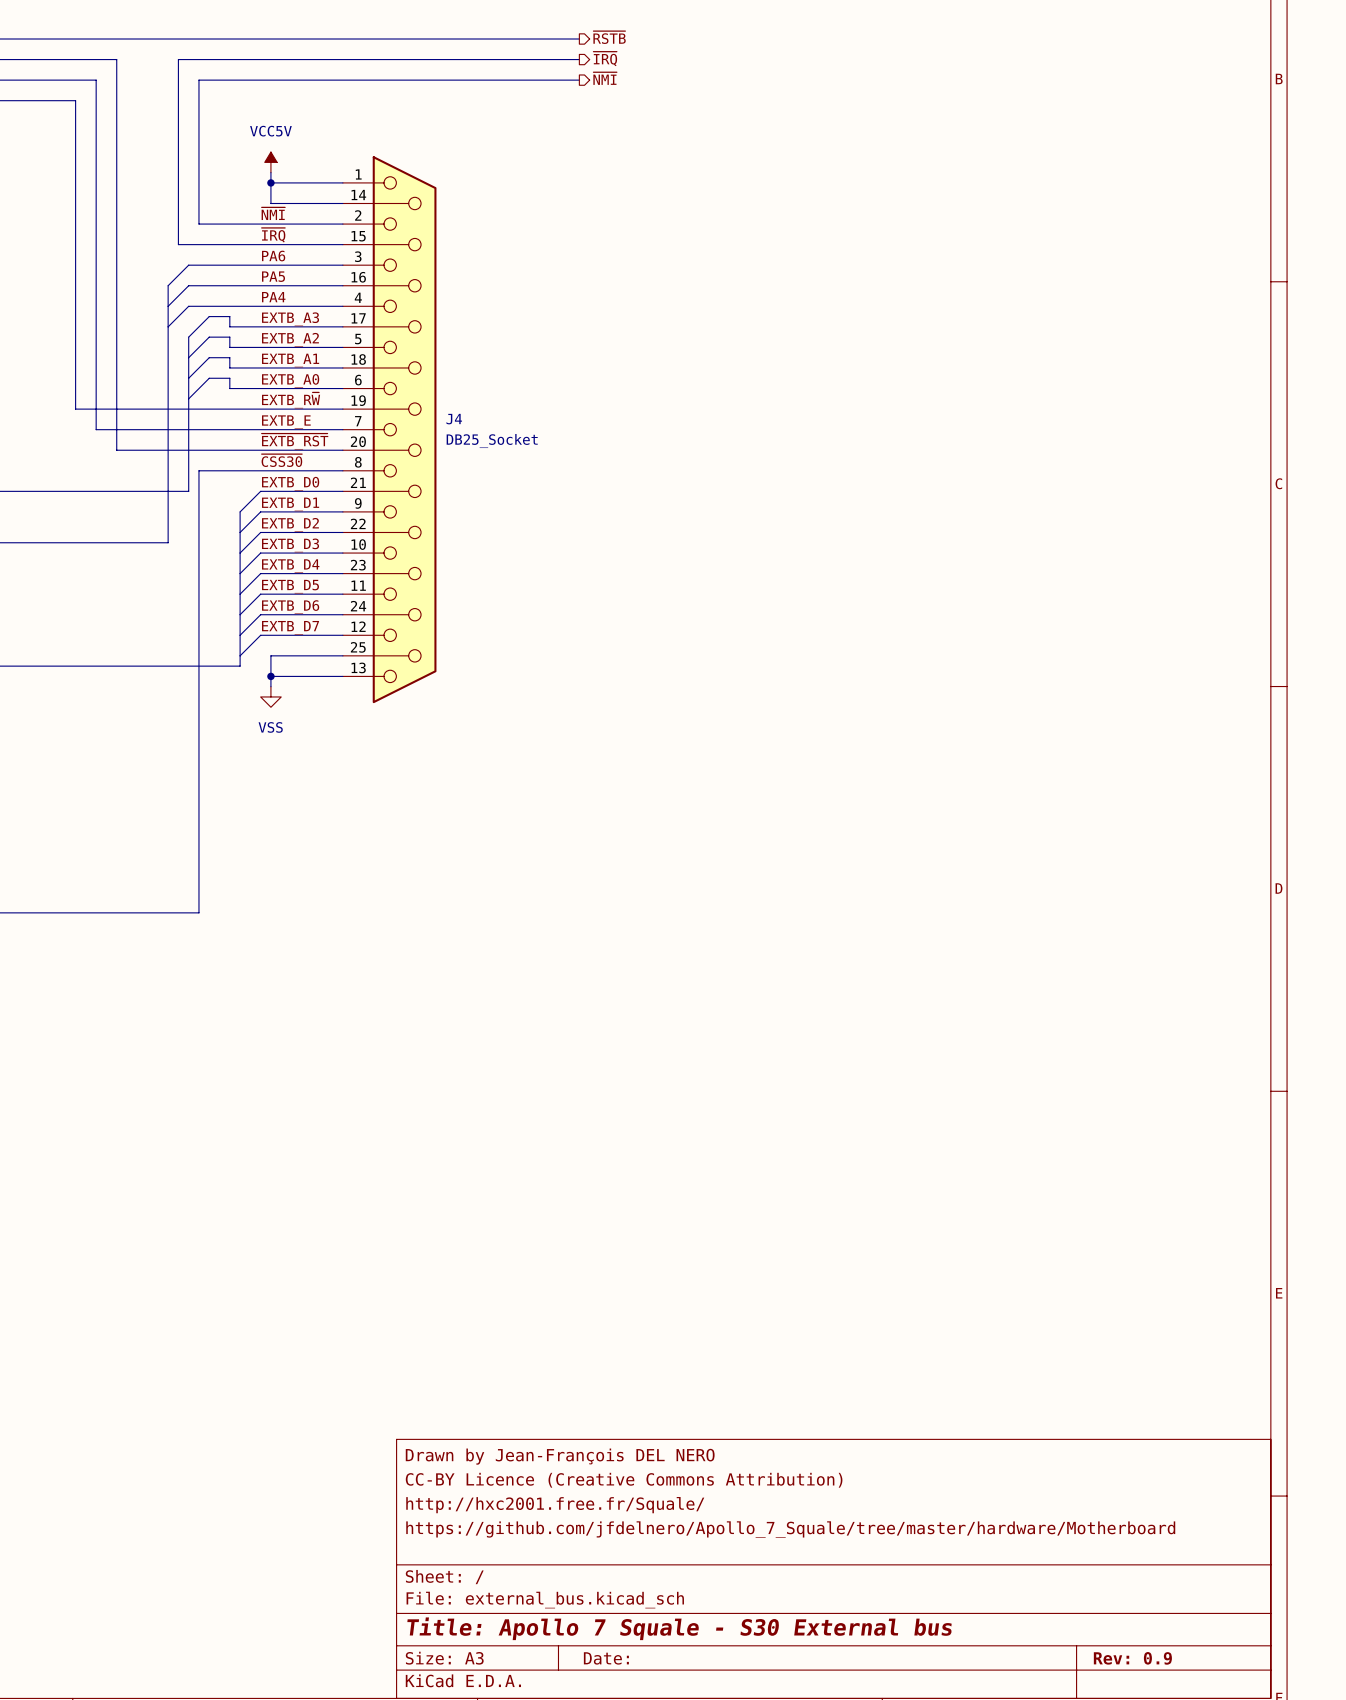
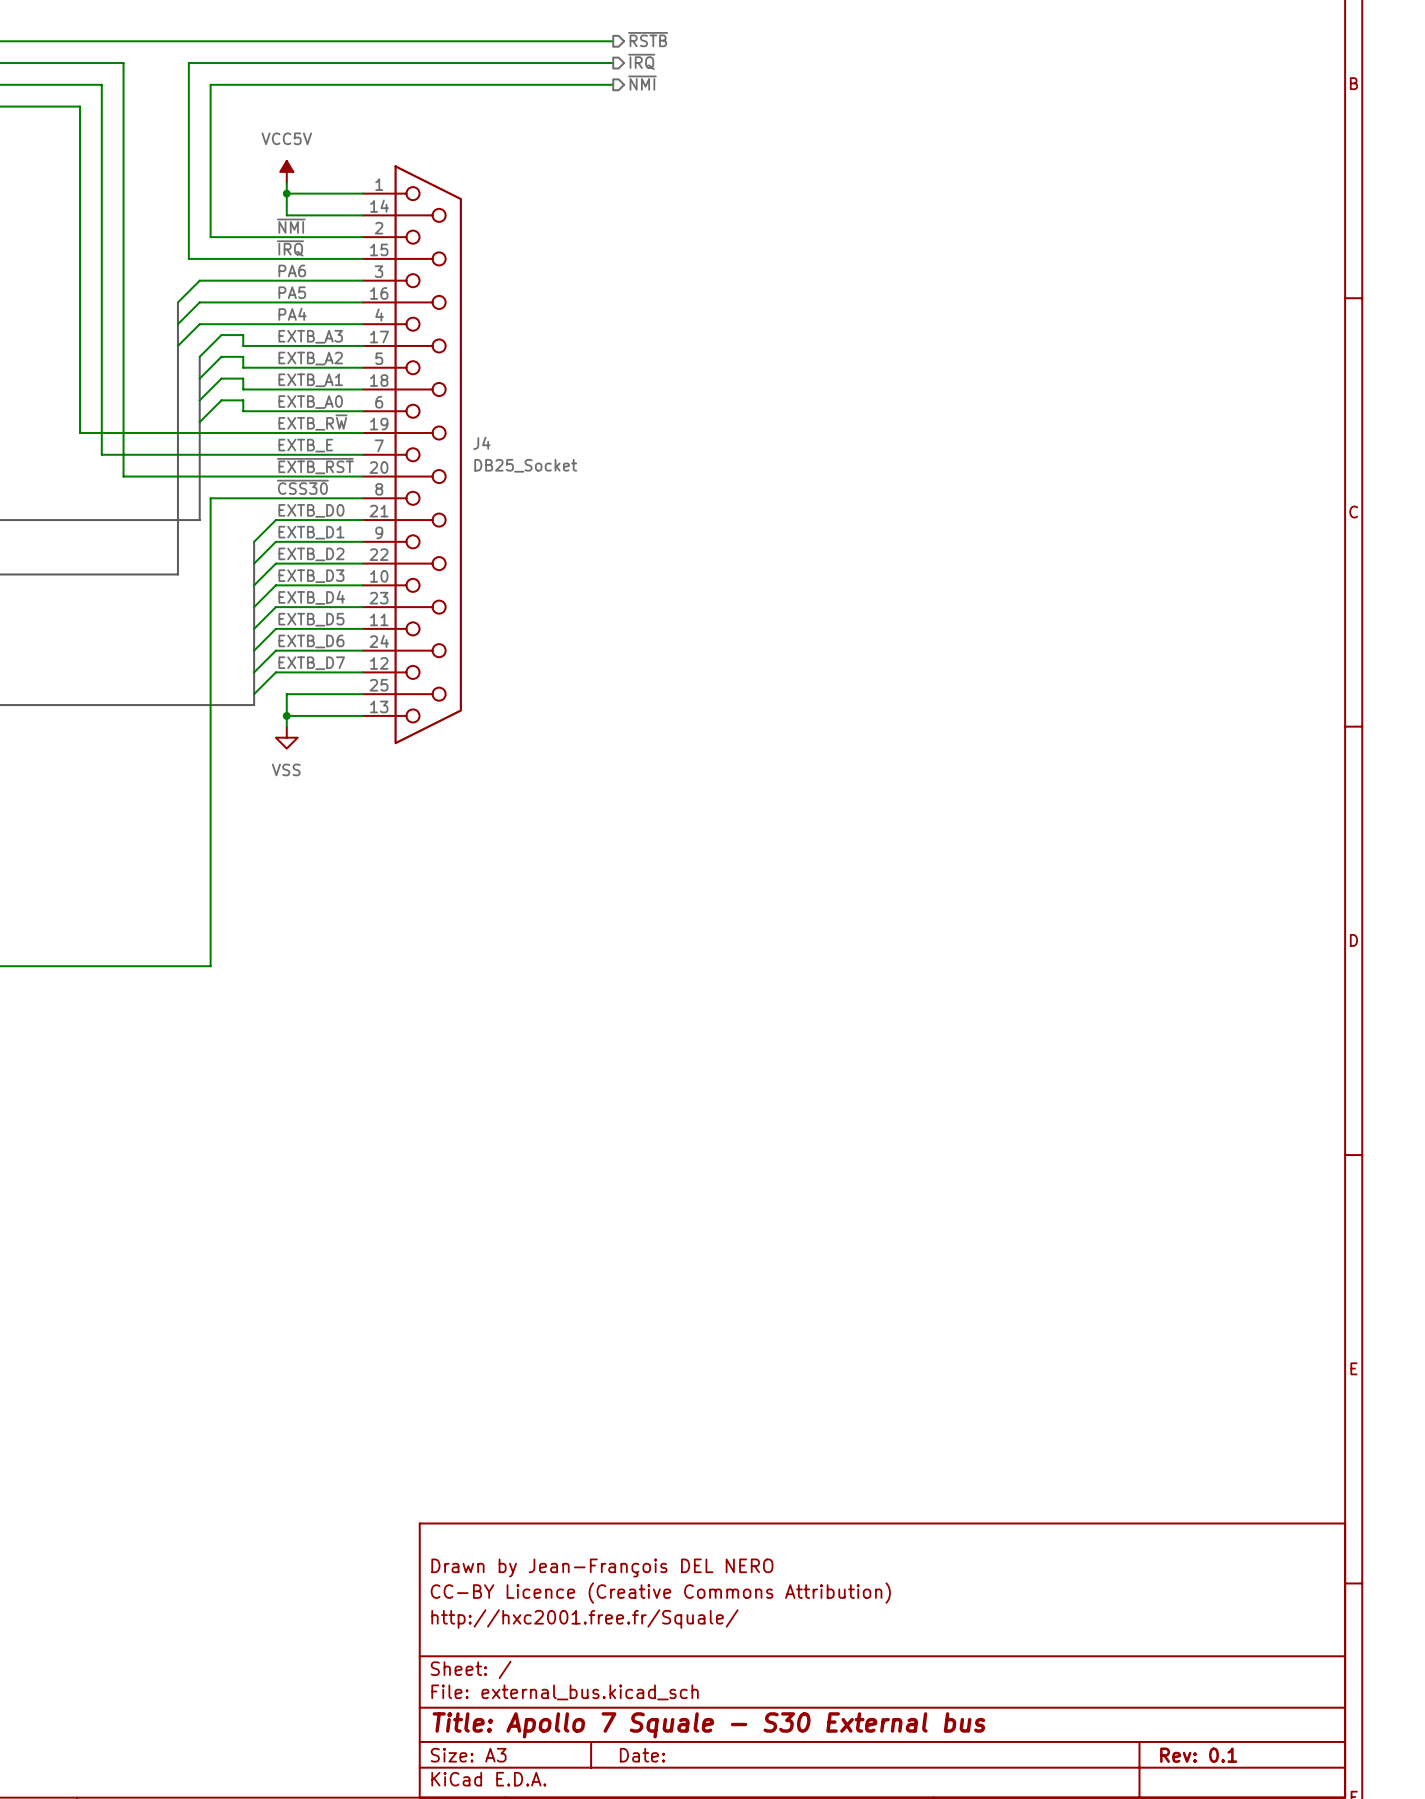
title block: Drawn by Jean-François DEL NERO (560, 1456) -> none
title block: CC-BY Licence (Creative Commons Attribution) (624, 1480) -> Drawn by Jean-François DEL NERO (602, 1567)
title block: http://hxc2001.free.fr/Squale/ (555, 1505) -> CC-BY Licence (Creative Commons Attribution) (660, 1593)
title block: https://github.com/jfdelnero/Apollo_7_Squale/tree/master/hardware/Motherboard (790, 1529) -> http://hxc2001.free.fr/Squale/ (584, 1619)
title block: Rev: 0.9 (1132, 1658) -> Rev: 0.1 (1198, 1755)

